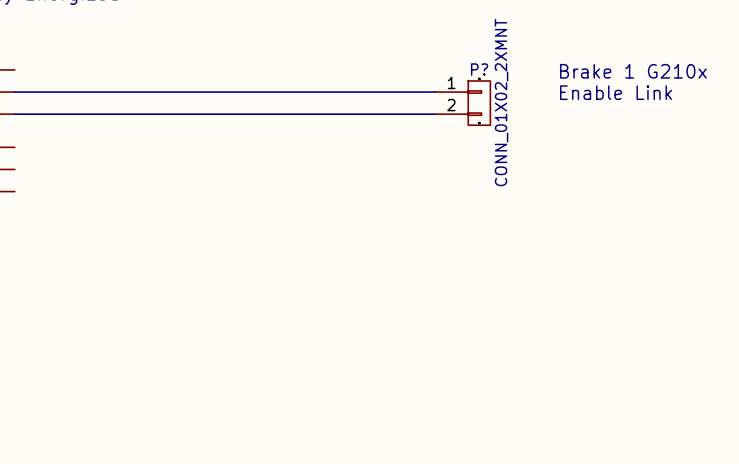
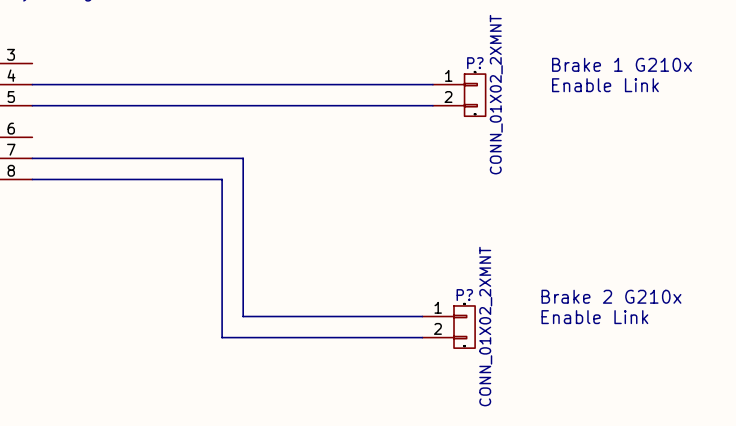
wire: none -> (32, 158) (243, 158) (243, 316) (422, 316)
wire: none -> (32, 179) (222, 179) (222, 337) (422, 337)
text: none -> Brake 2 G210x (611, 296)
text: none -> Enable Link (594, 317)
P?: none -> CONN_01X02_2XMNT (448, 327)

